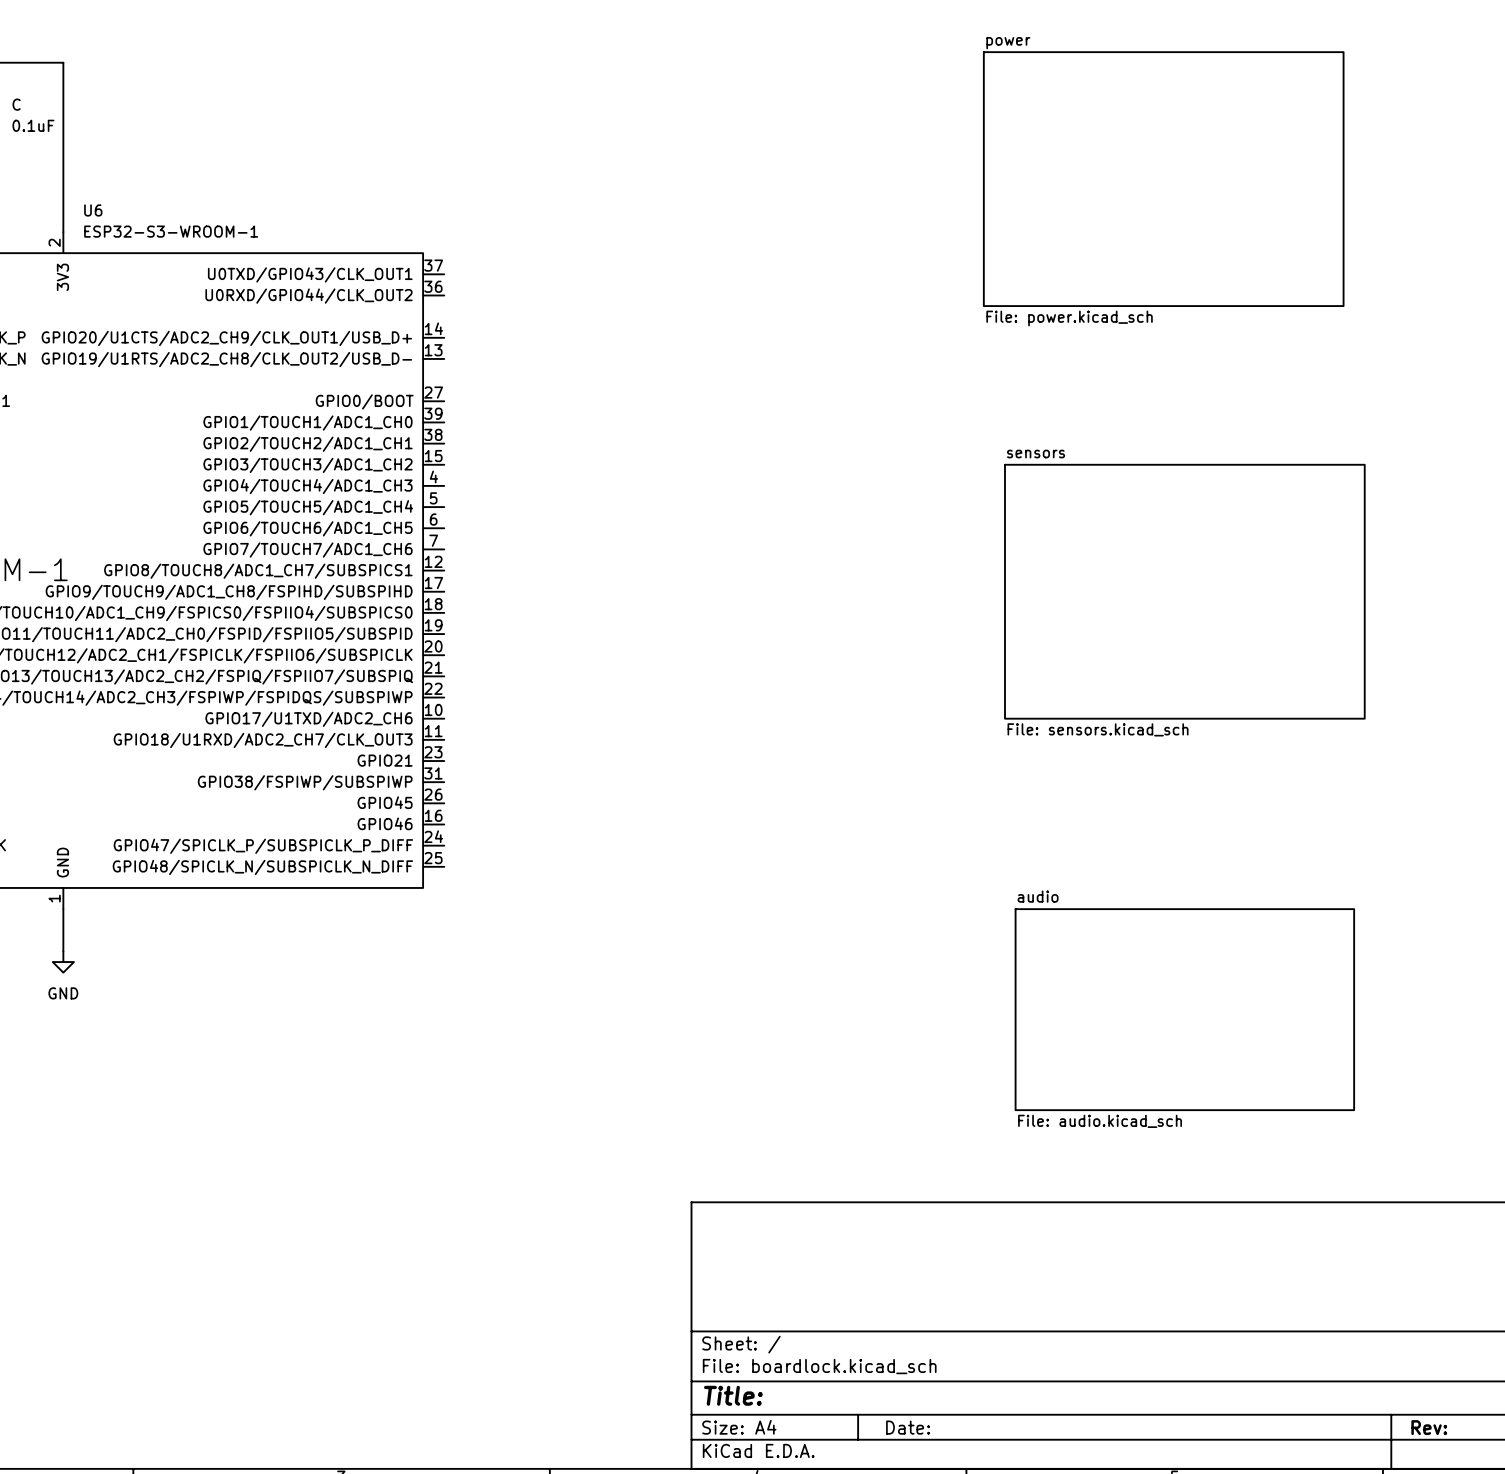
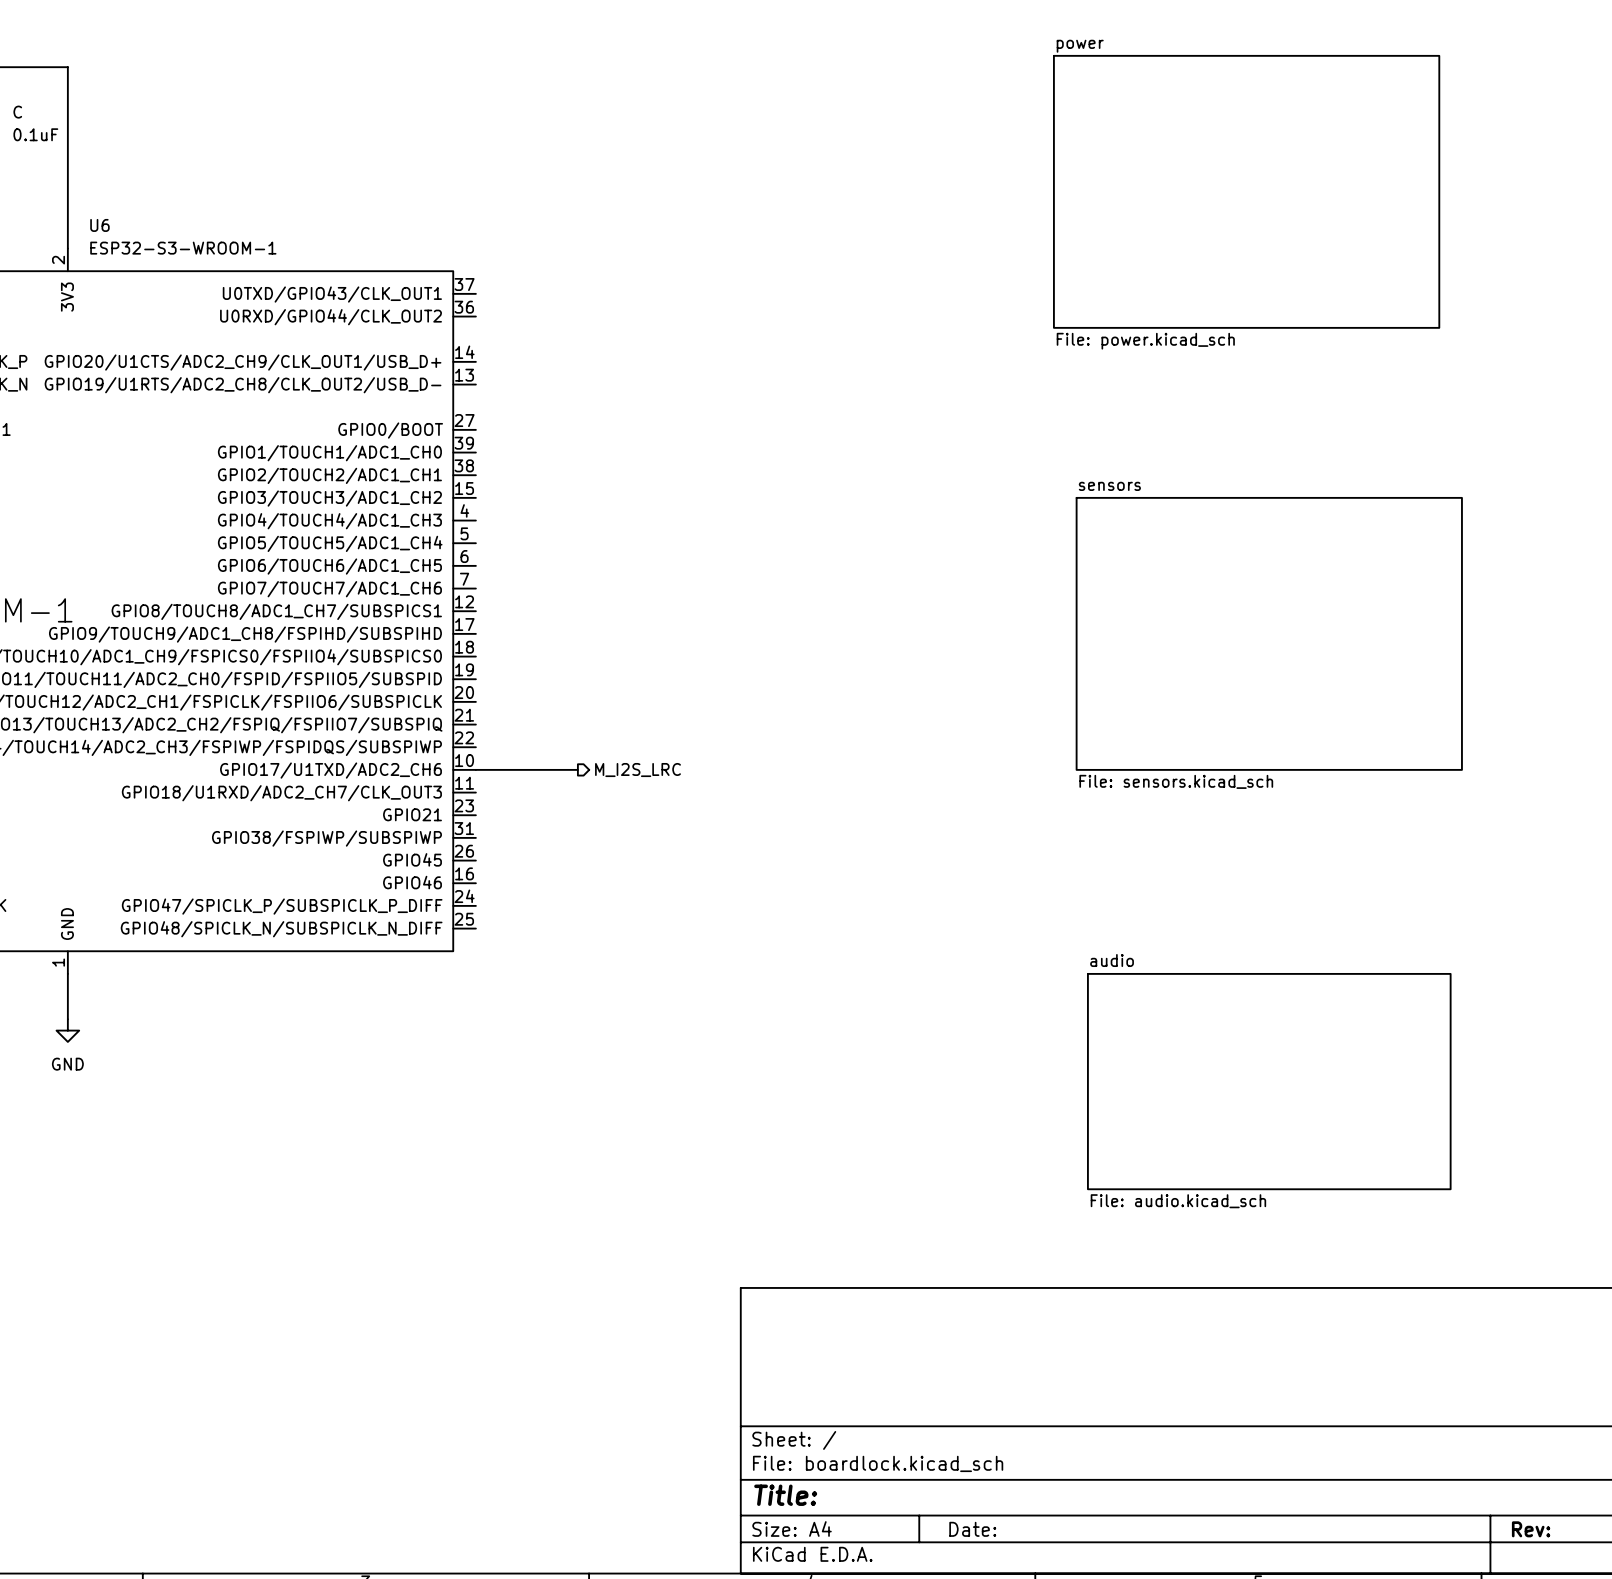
wire: none -> (475, 769) (577, 769)
hierarchical label: none -> M_I2S_LRC (637, 770)

